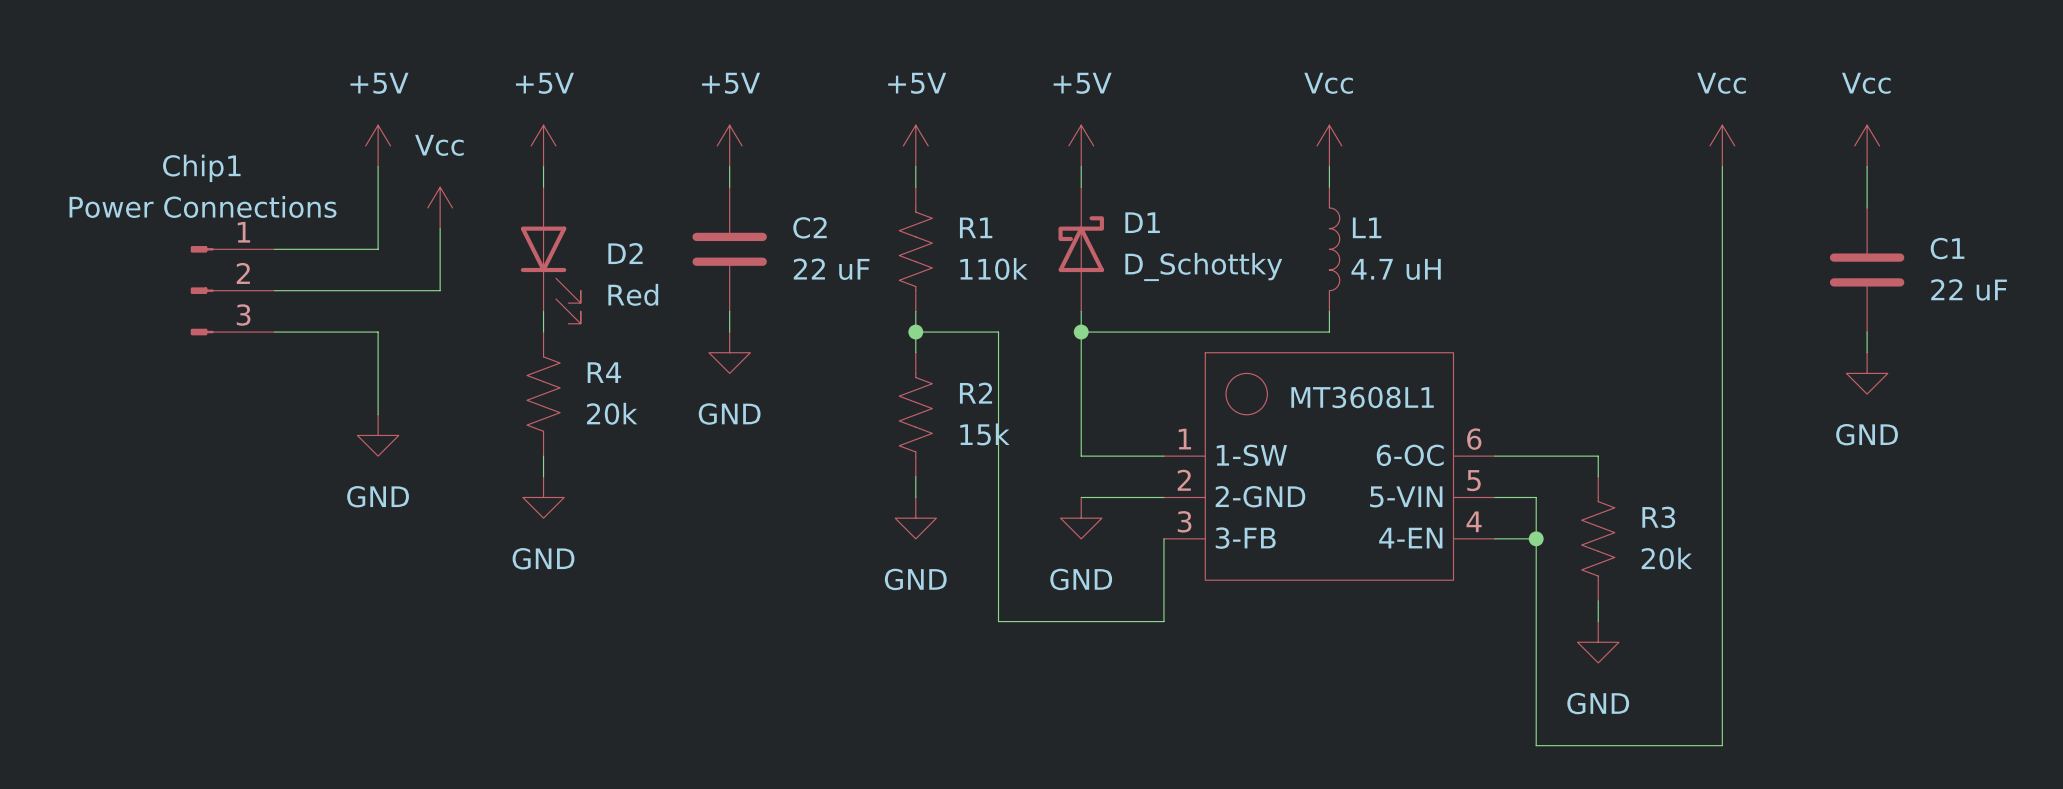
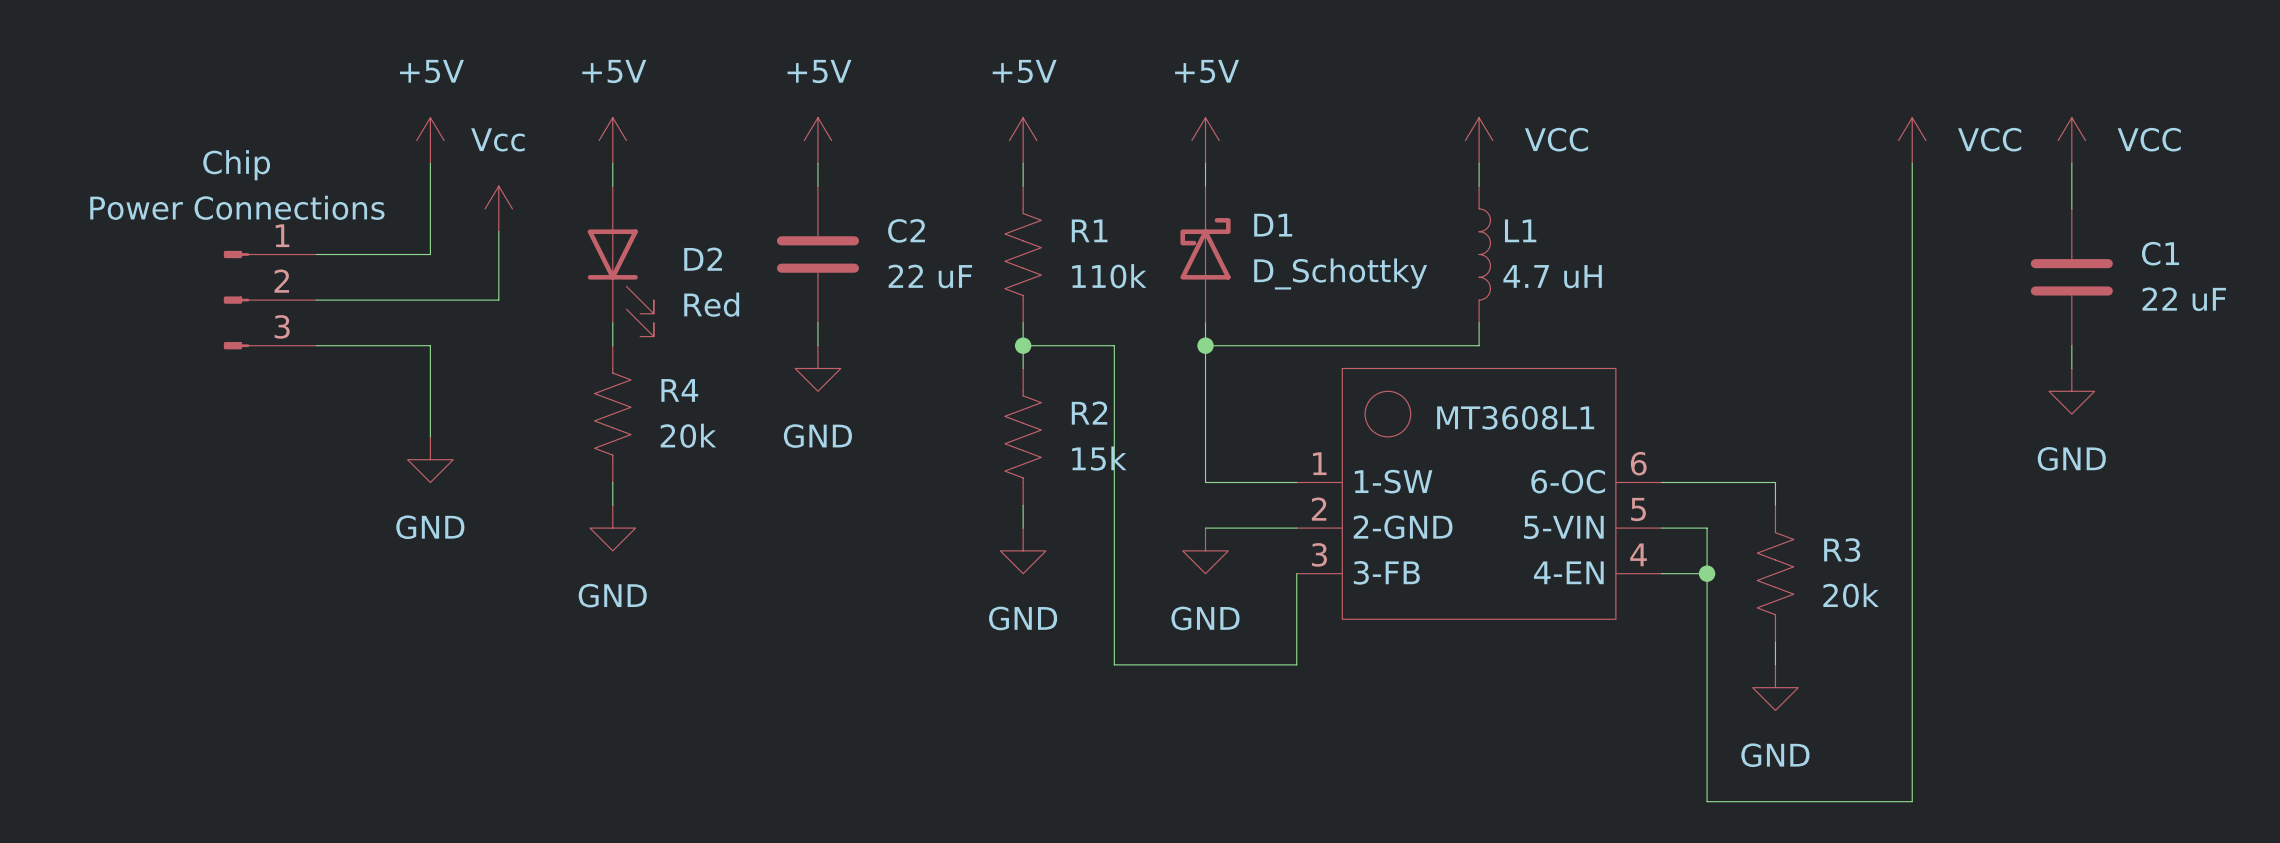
power symbol: Vcc (1329, 145) -> VCC (1479, 140)
power symbol: Vcc (1722, 145) -> VCC (1912, 140)
power symbol: Vcc (1867, 145) -> VCC (2071, 140)
Chip1 name: Chip1 (201, 168) -> Chip (236, 165)

